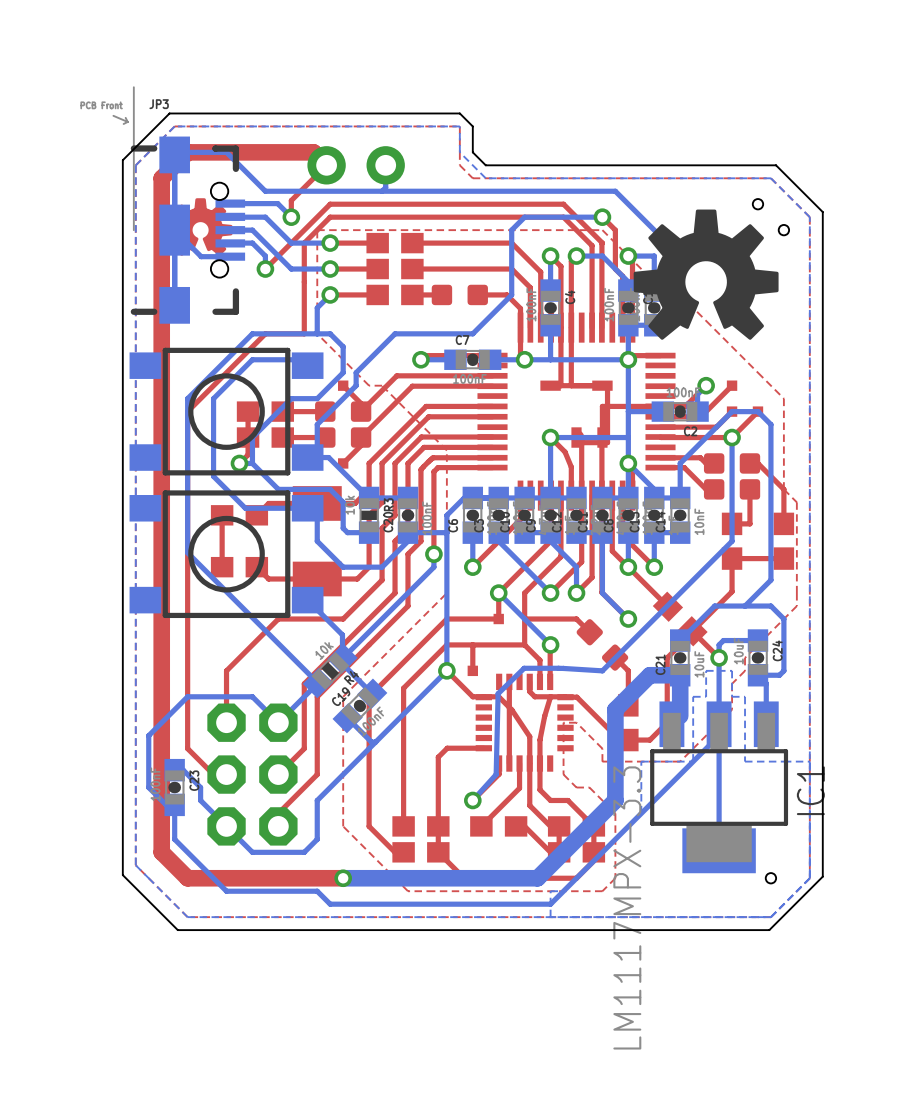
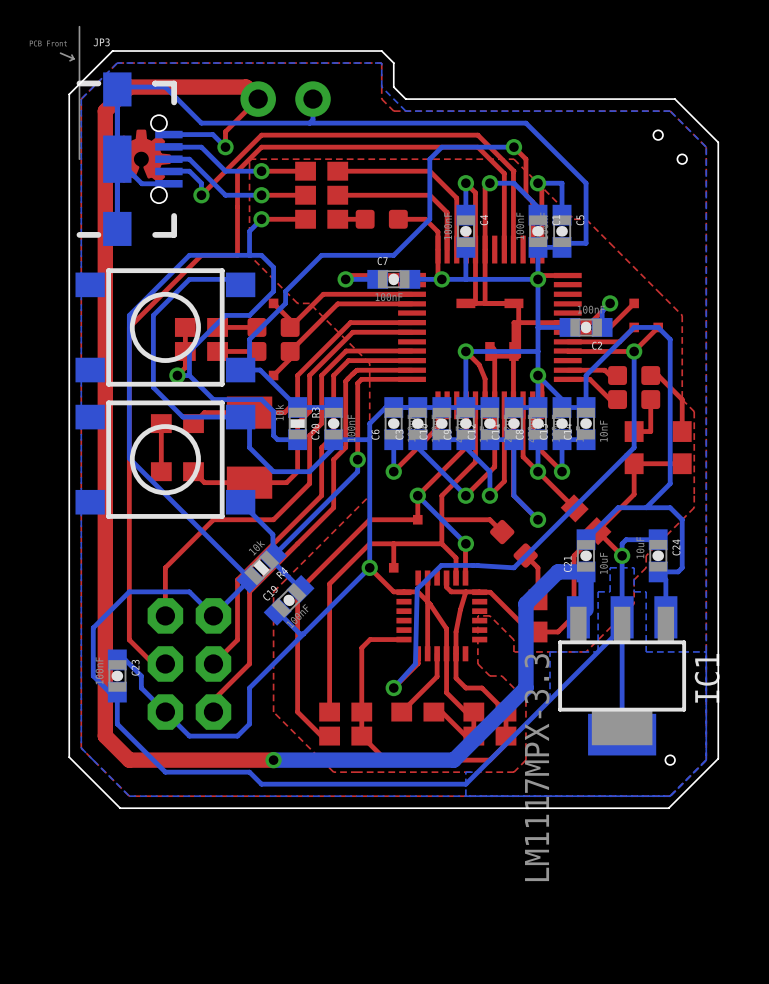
drawing: [633, 209, 779, 340] -> none

